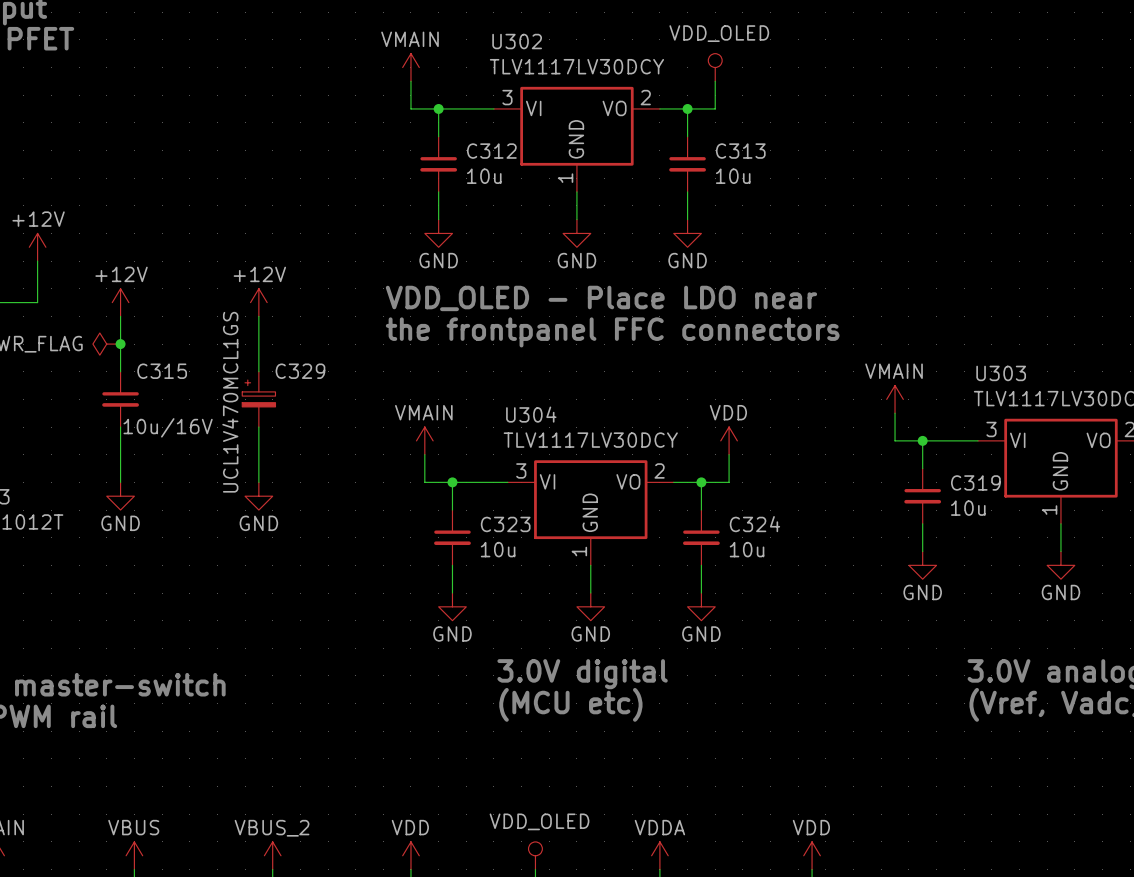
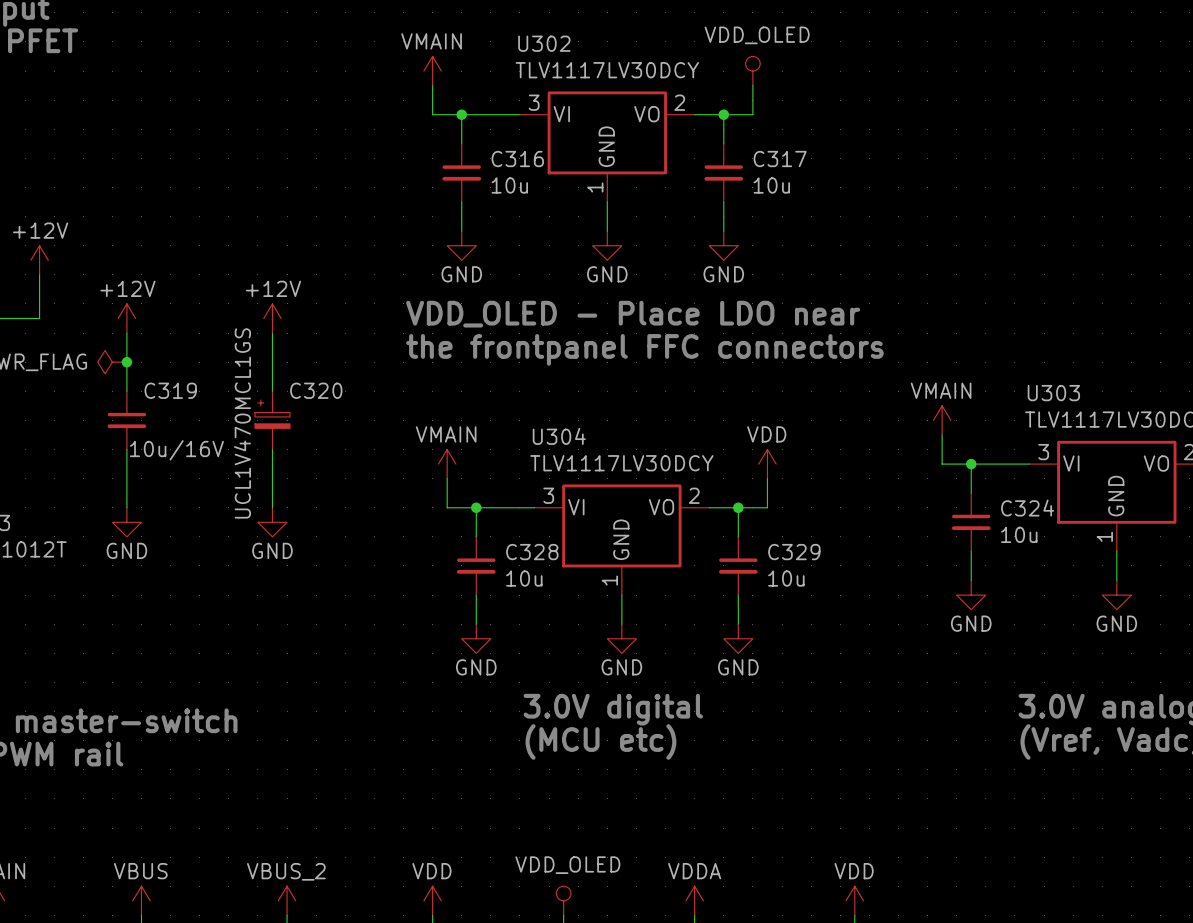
C312 name: C312 (491, 151) -> C316 (517, 159)
C313 name: C313 (740, 151) -> C317 (780, 159)
C315 name: C315 (162, 371) -> C319 (170, 390)
C329 name: C329 (300, 371) -> C320 (316, 390)
C319 name: C319 (975, 482) -> C324 (1027, 508)
C323 name: C323 (505, 524) -> C328 (532, 552)
C324 name: C324 (754, 524) -> C329 (794, 552)

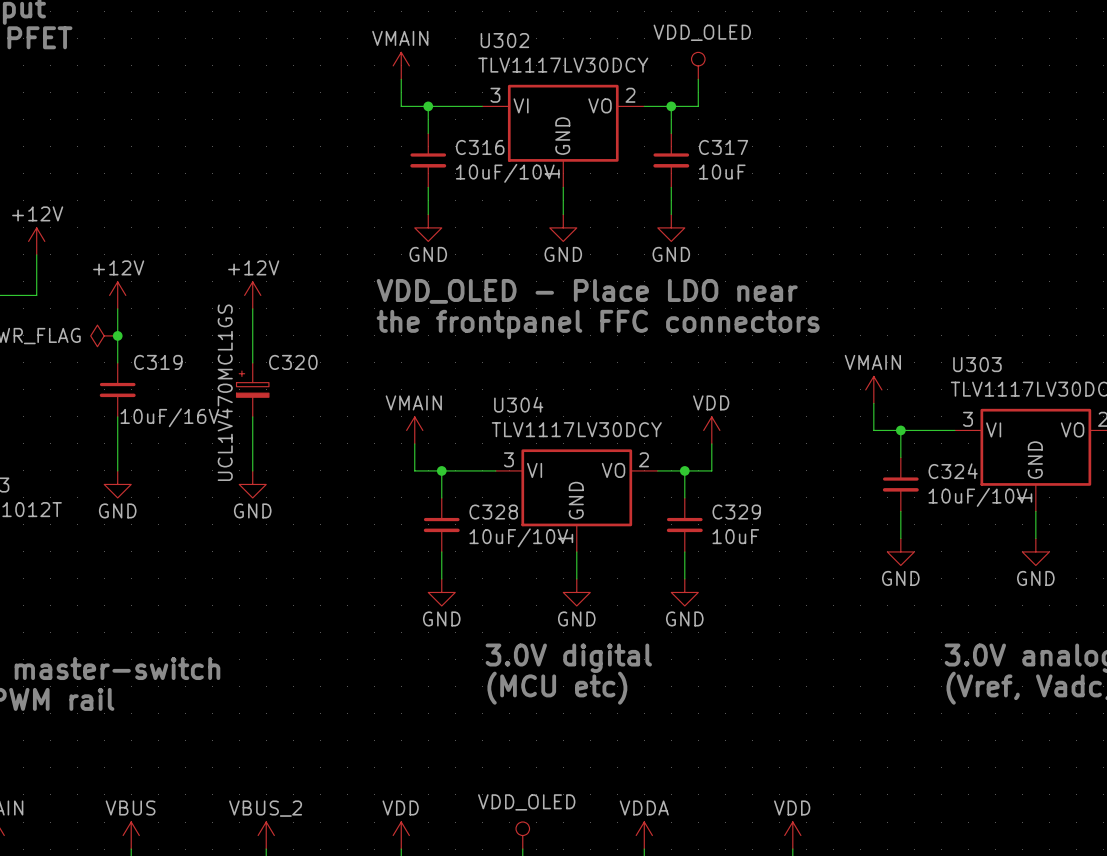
C316 value: 10u (509, 185) -> 10uF/10V (505, 173)
C317 value: 10u (771, 185) -> 10uF (722, 172)
C319 value: 10u/16V (176, 450) -> 10uF/16V (169, 417)
C324 value: 10u (1019, 534) -> 10uF/10V (977, 497)
C328 value: 10u (524, 578) -> 10uF/10V (518, 537)
C329 value: 10u (786, 578) -> 10uF (735, 536)

